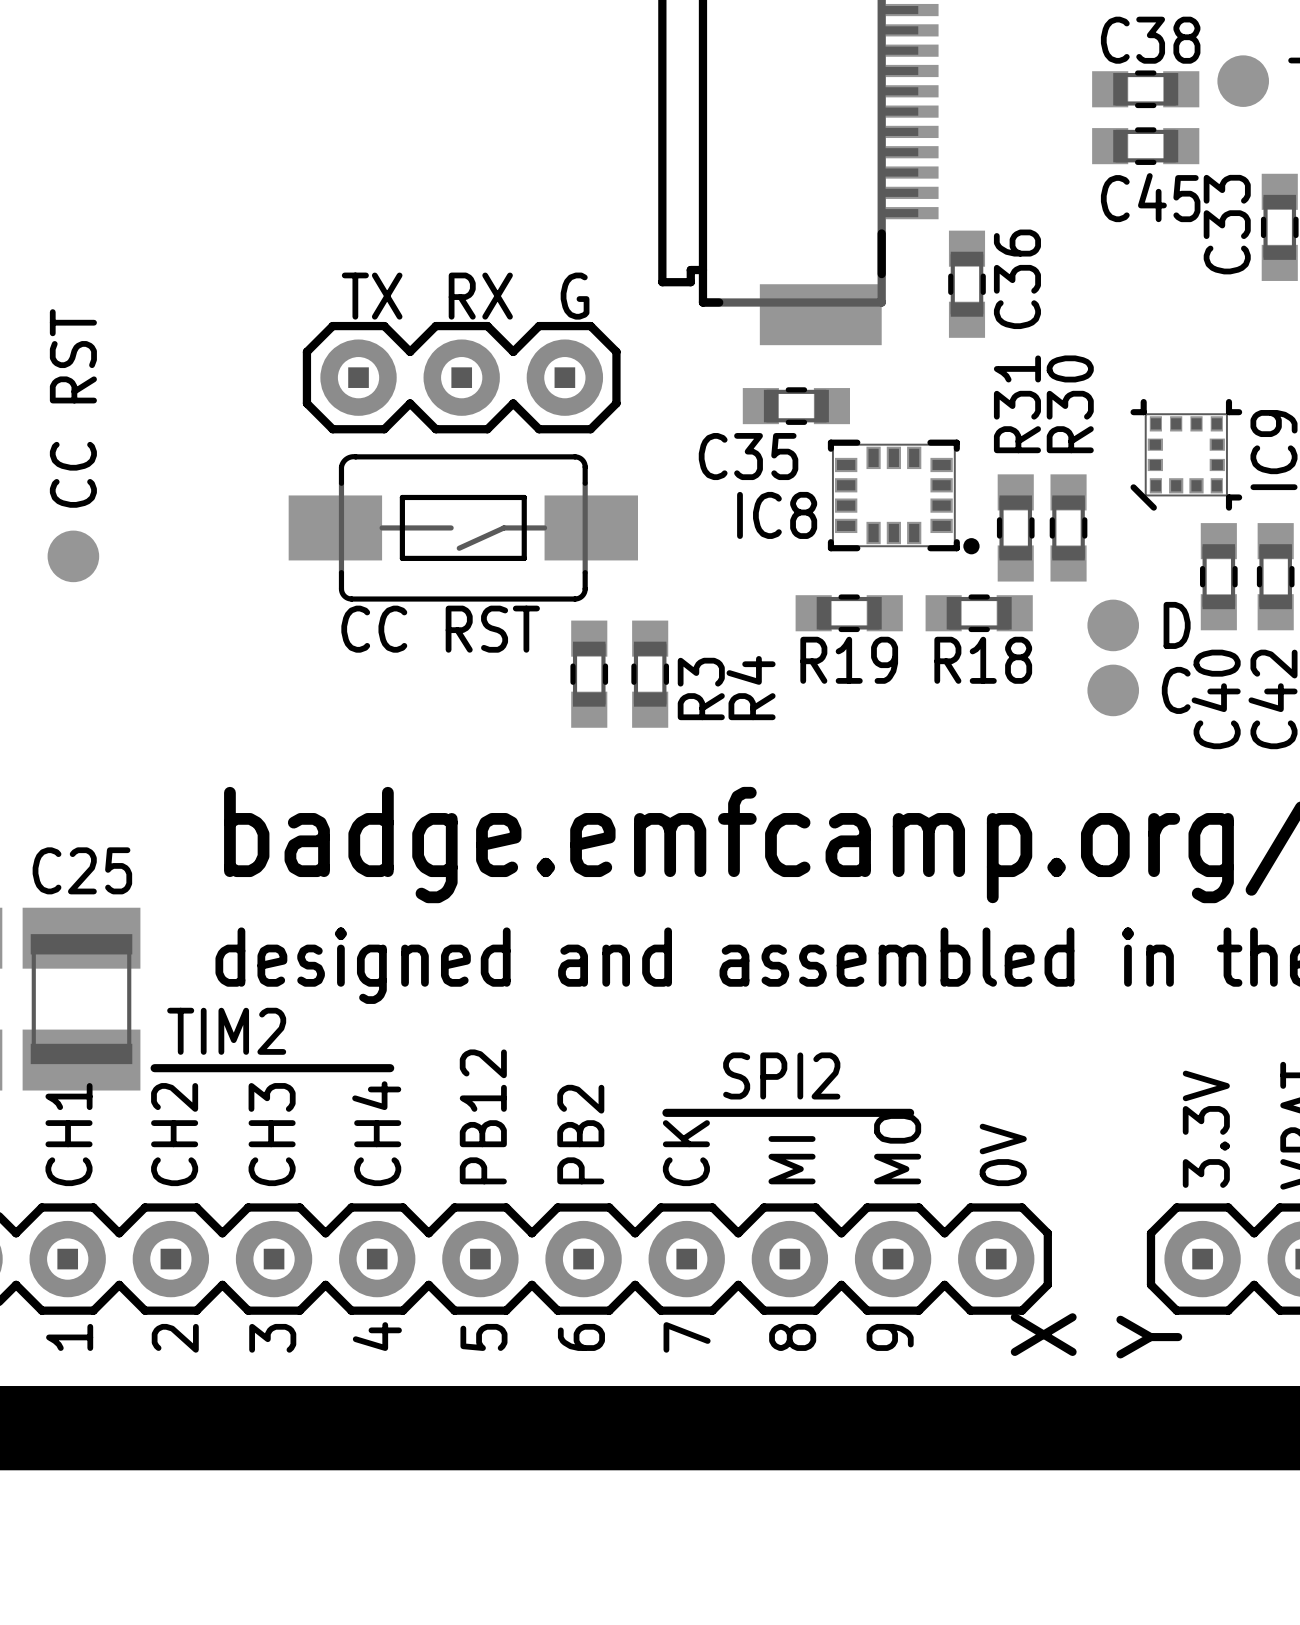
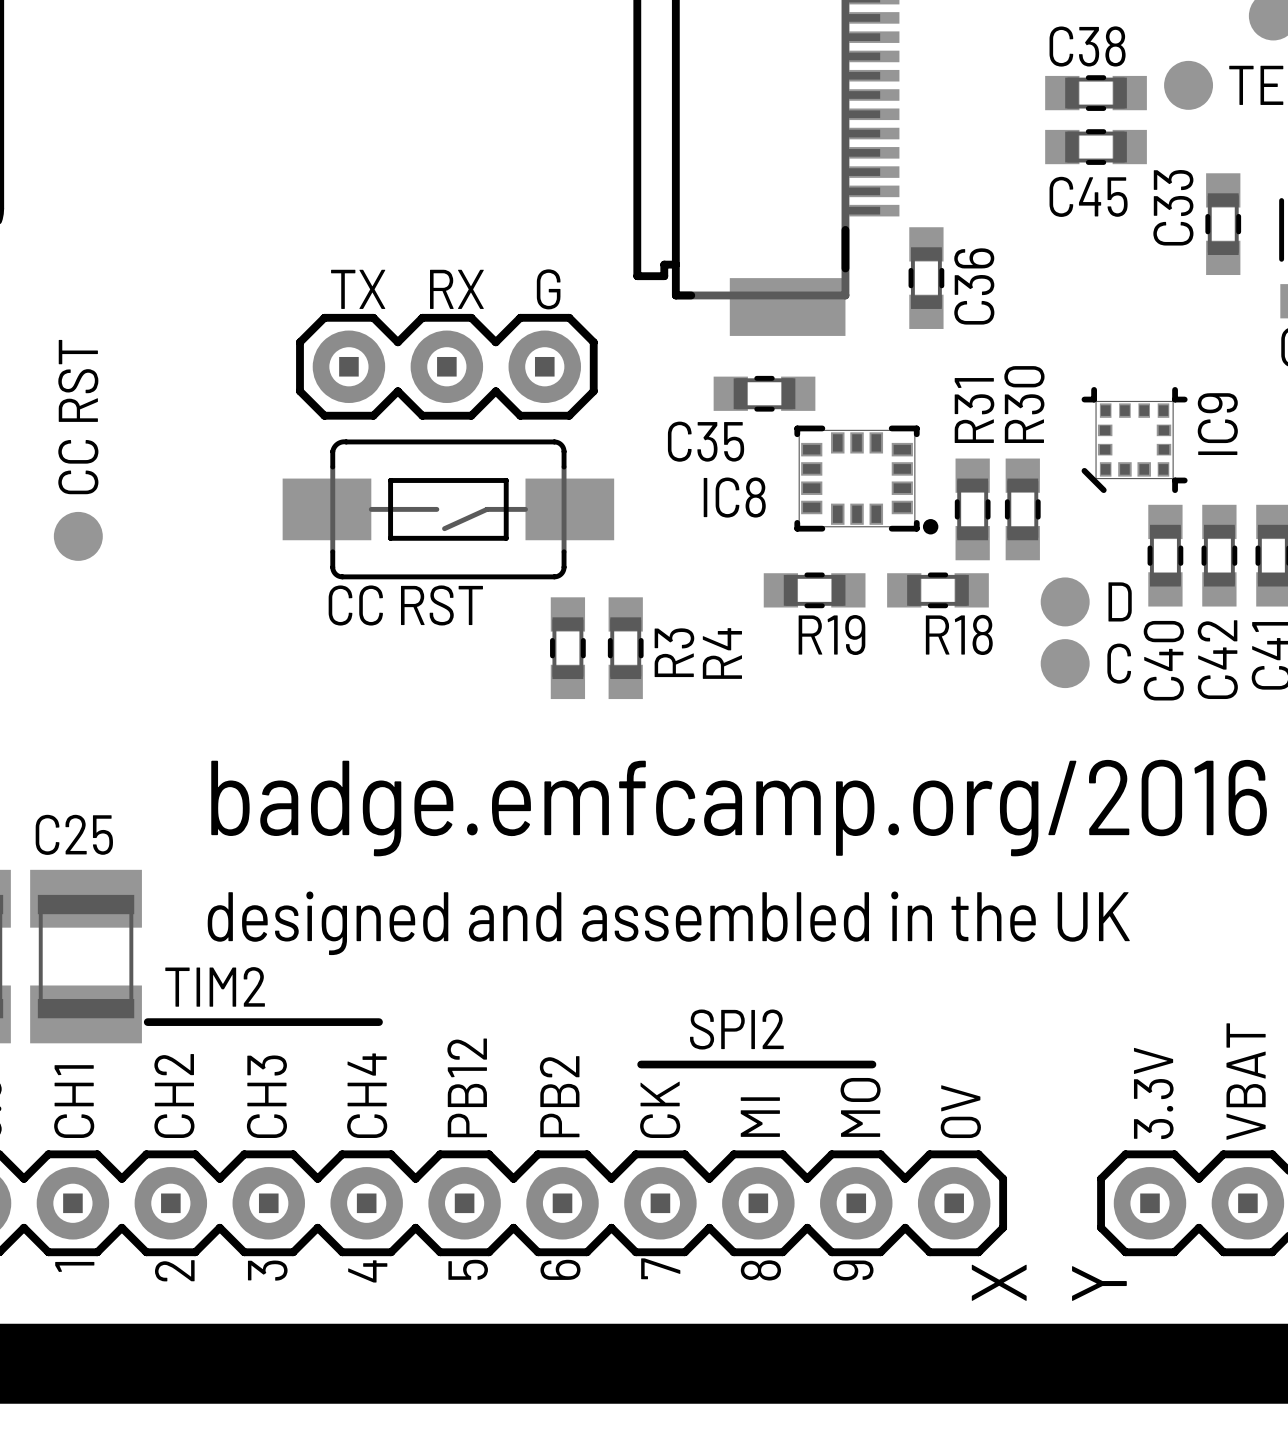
line: none -> (155, 1022) (147, 1022)

